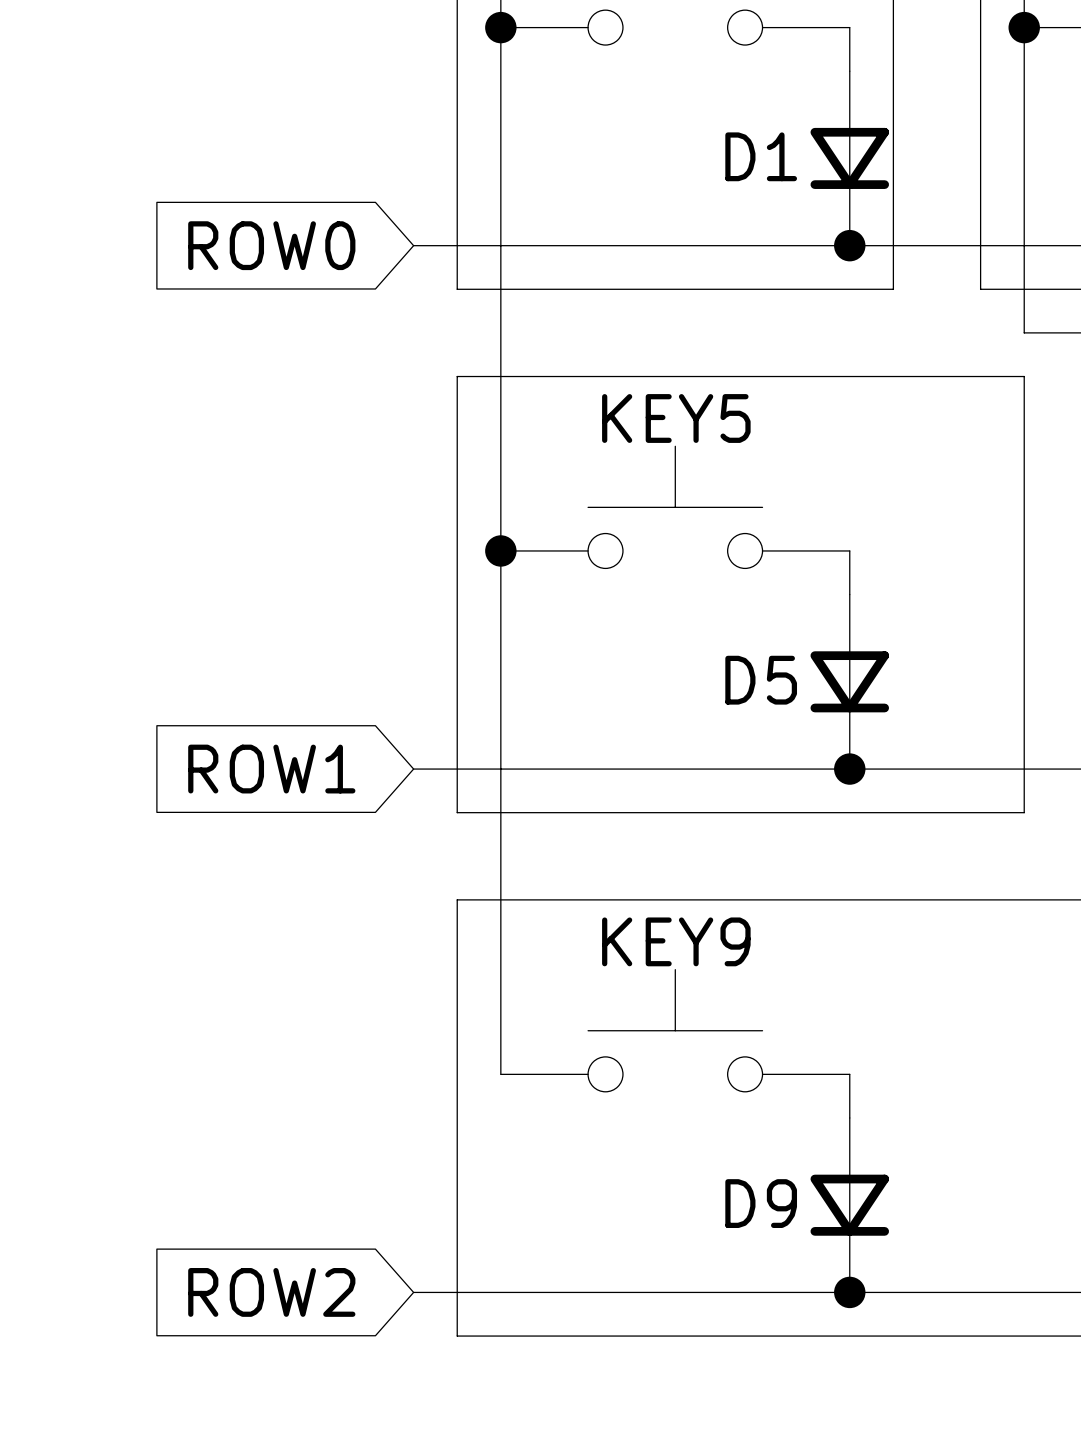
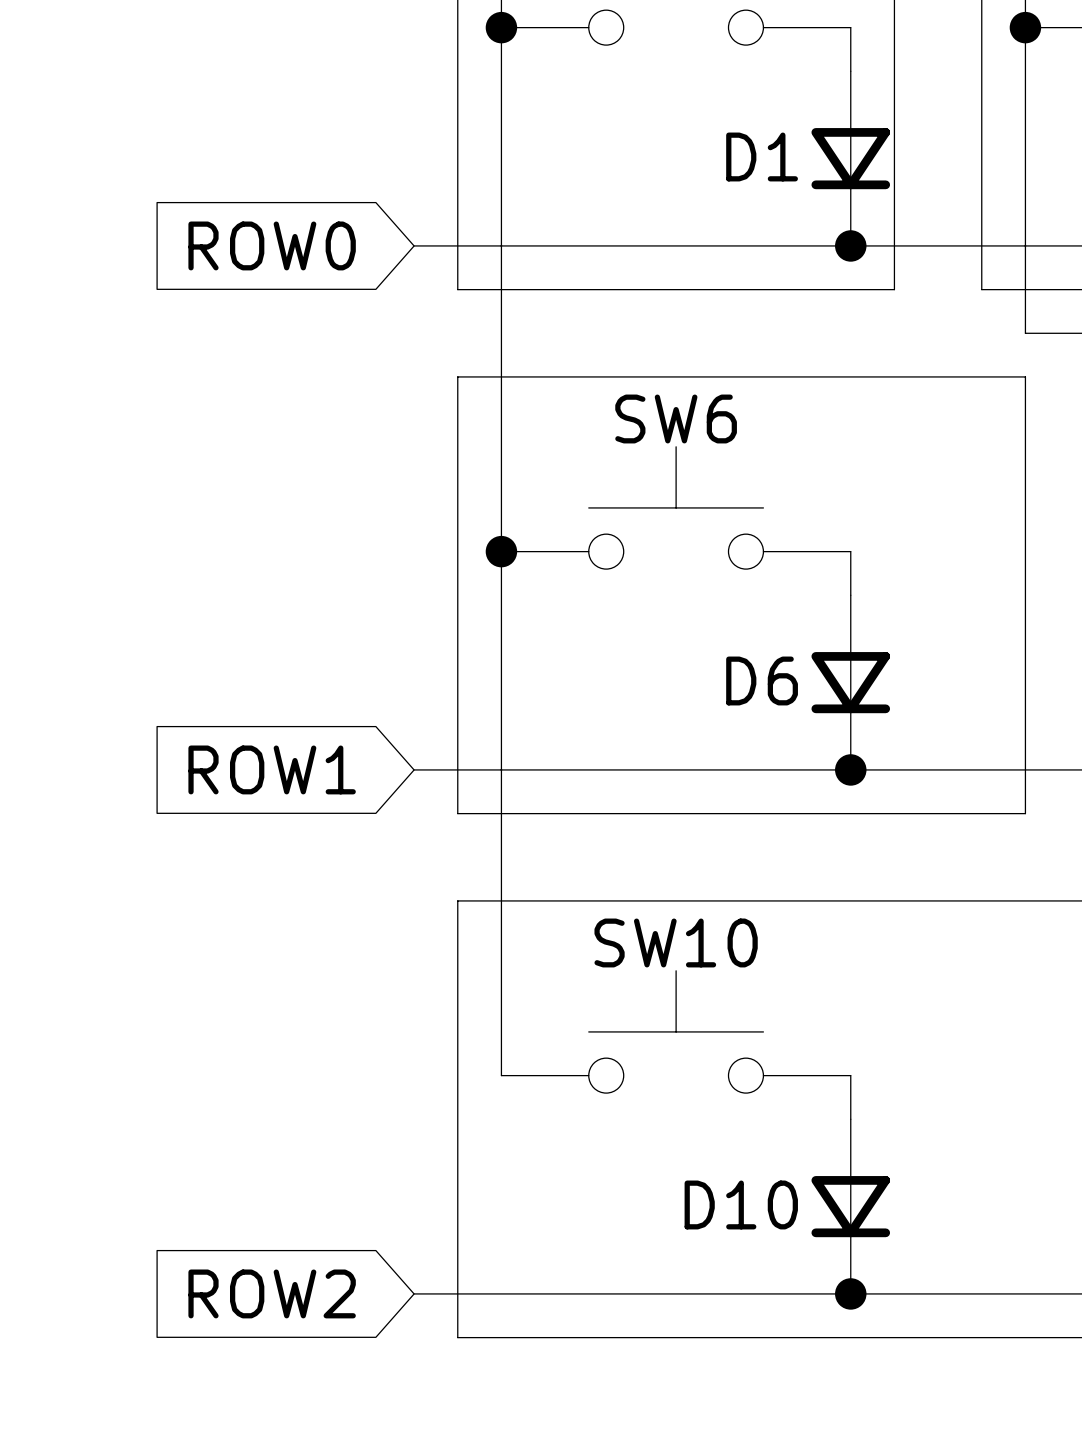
KEY5 name: KEY5 (676, 418) -> SW6 (676, 418)
D5 name: D5 (761, 680) -> D6 (762, 680)
KEY9 name: KEY9 (676, 941) -> SW10 (676, 942)
D9 name: D9 (761, 1203) -> D10 (741, 1204)

